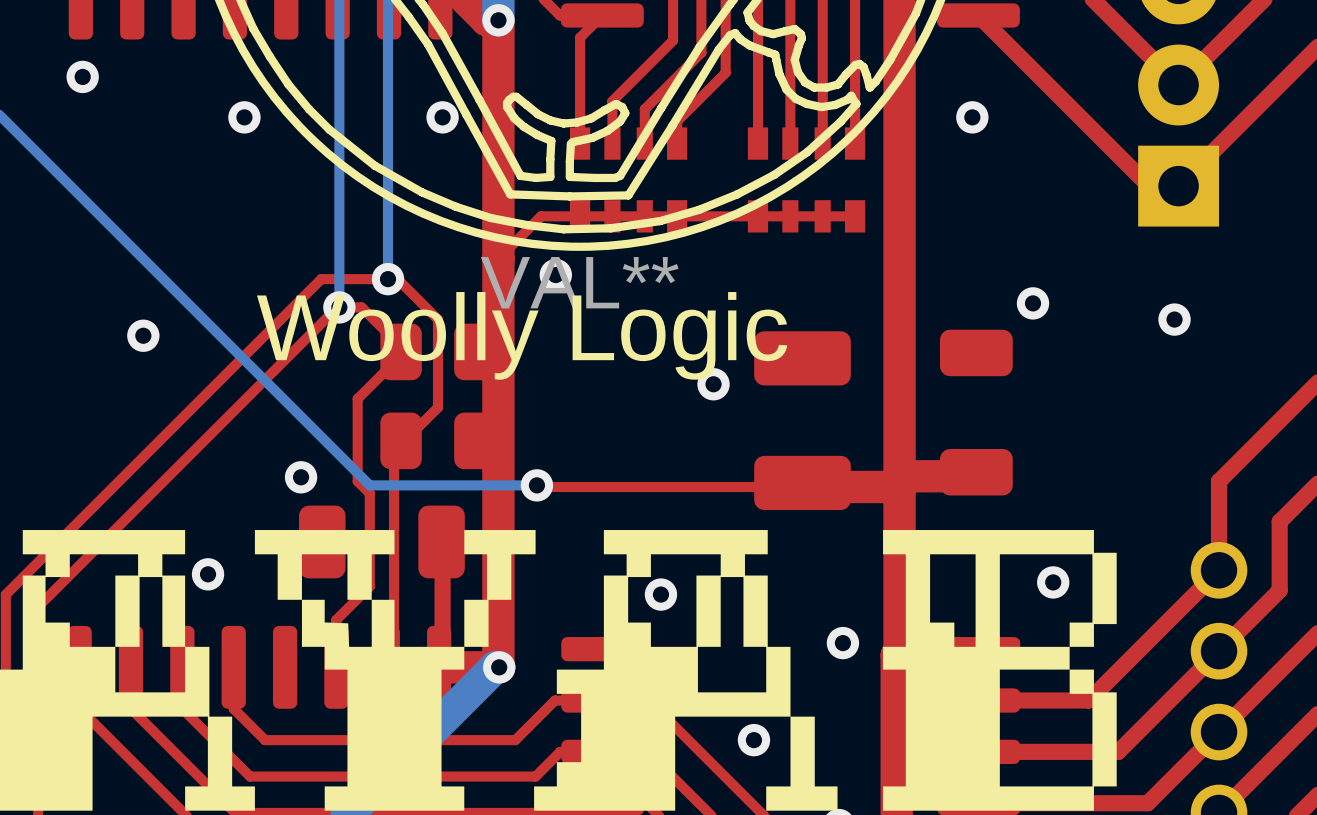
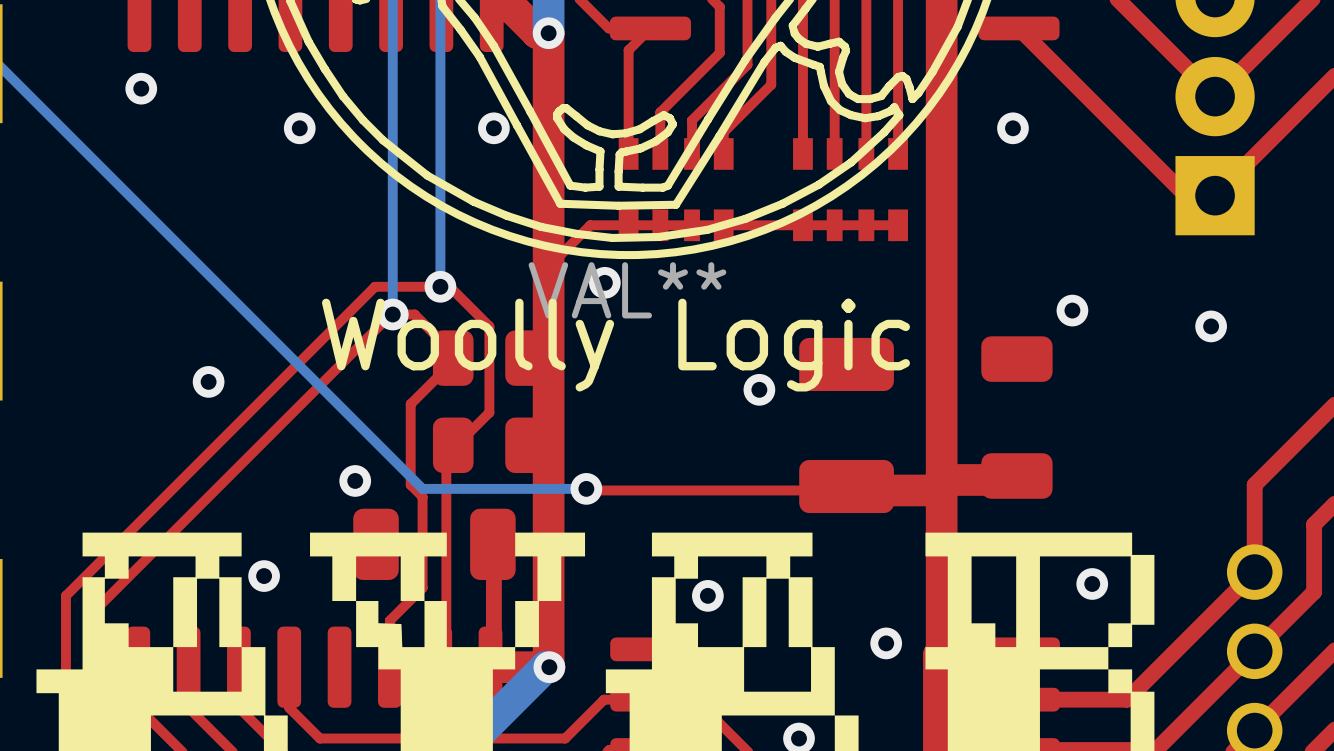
via position: (143, 335) -> (208, 381)

